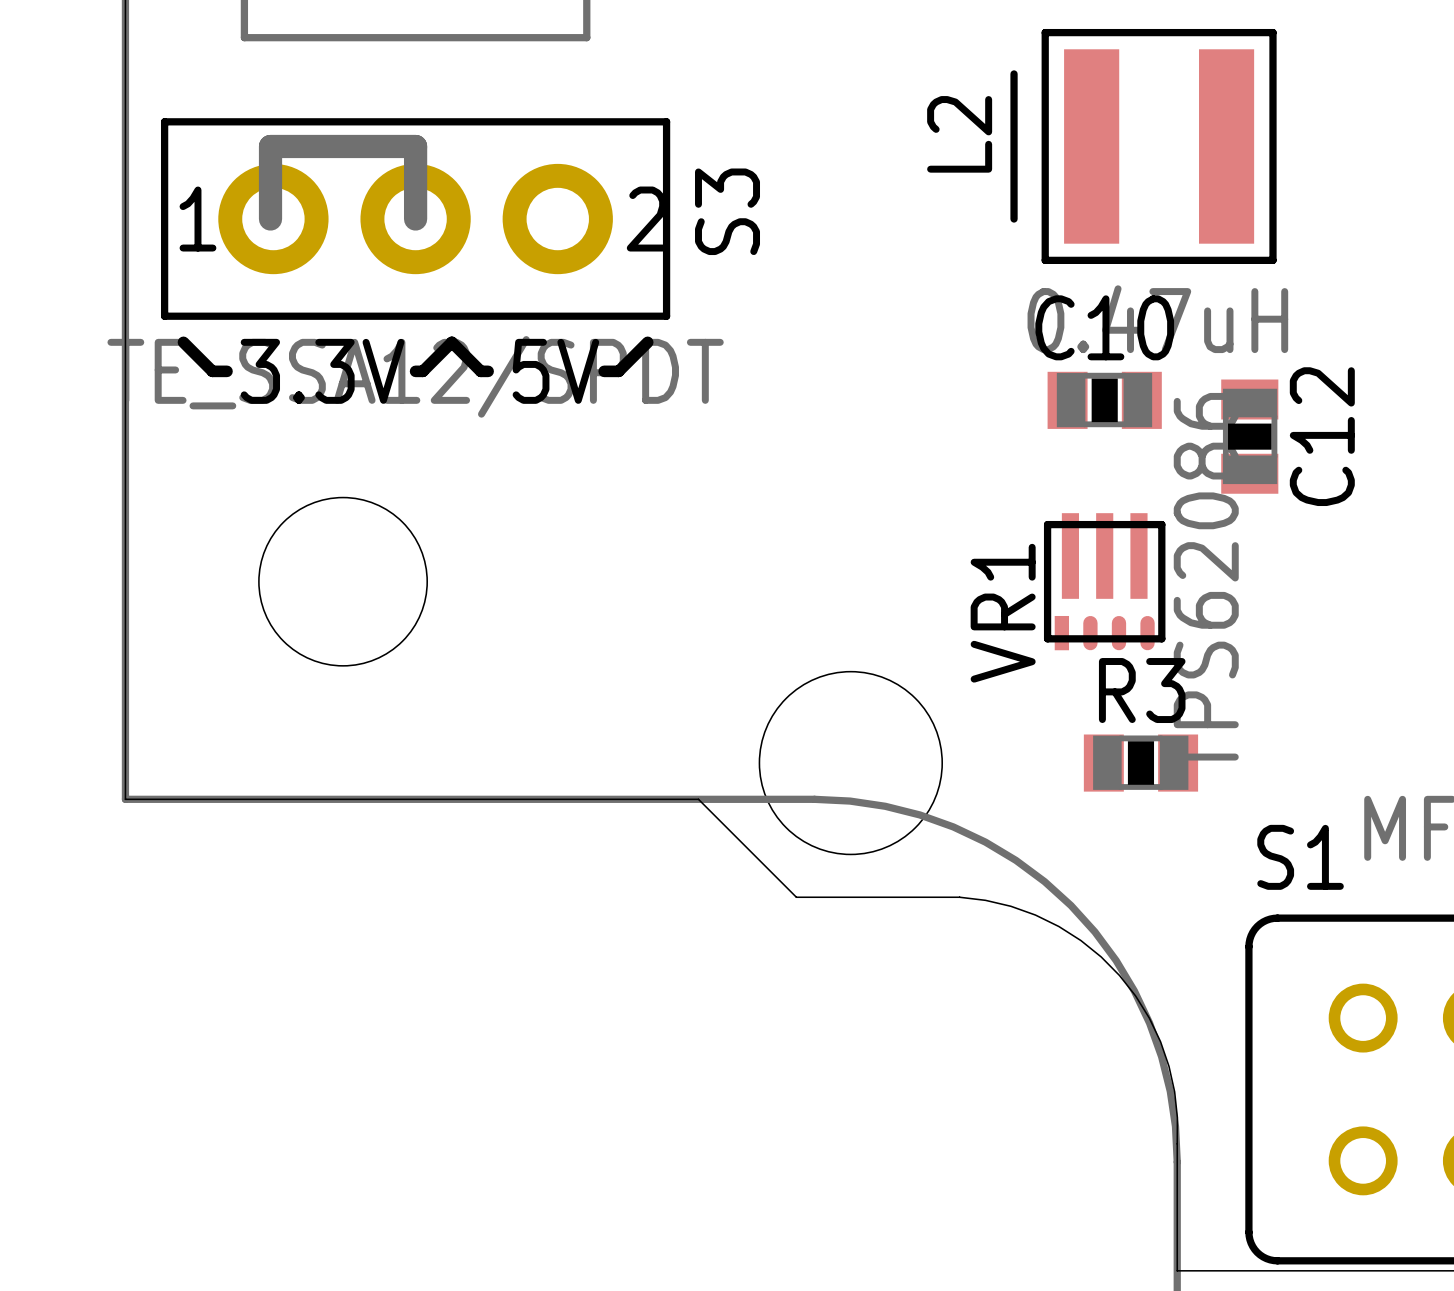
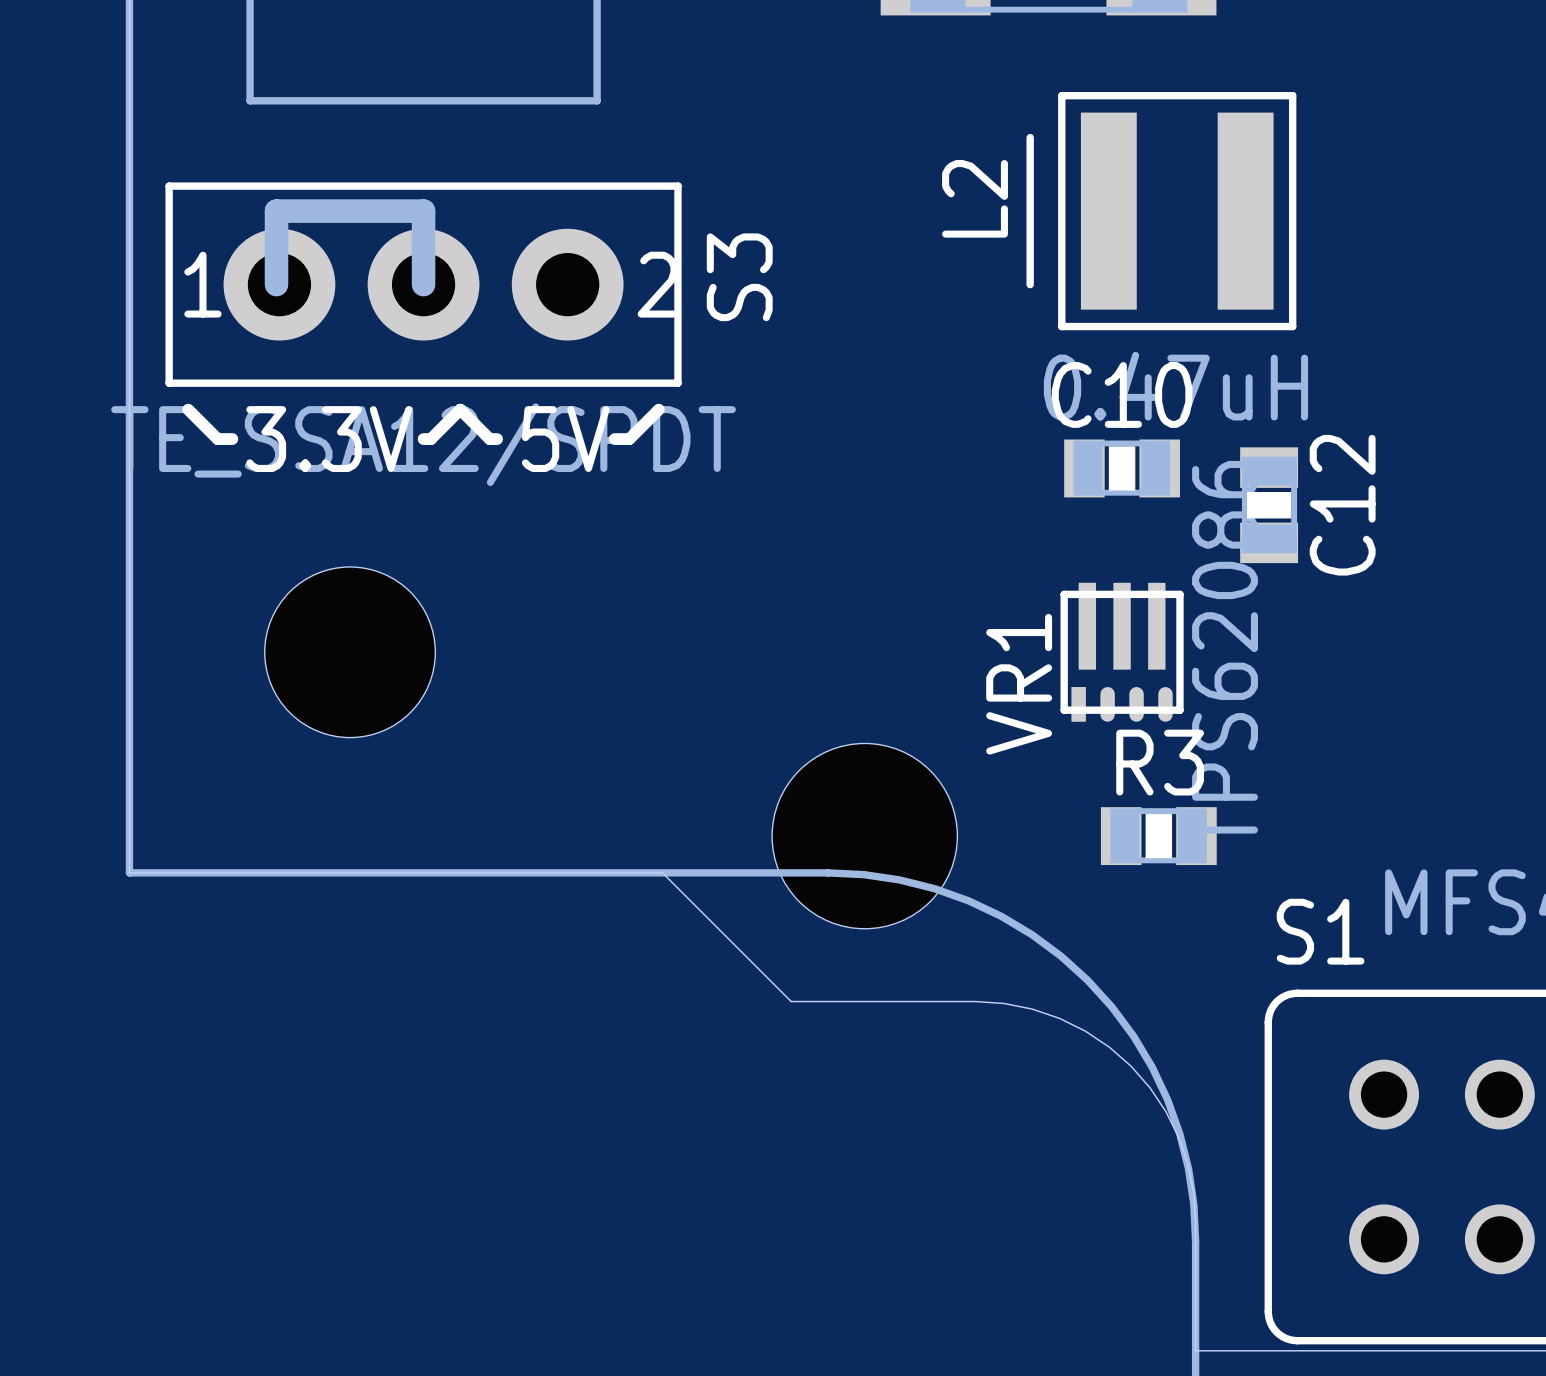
board edge: (651, 799) (698, 799) (796, 897) (959, 897) (985, 900) (1035, 915) (1080, 940) (1119, 975) (1149, 1018) (1160, 1041) (1174, 1091) (1177, 1143) -> (662, 872) (791, 1001) (975, 1001) (1003, 1003) (1032, 1009) (1059, 1018) (1085, 1031) (1109, 1047) (1131, 1066) (1150, 1087) (1166, 1111) (1178, 1137) (1188, 1165) (1193, 1193) (1195, 1222)

